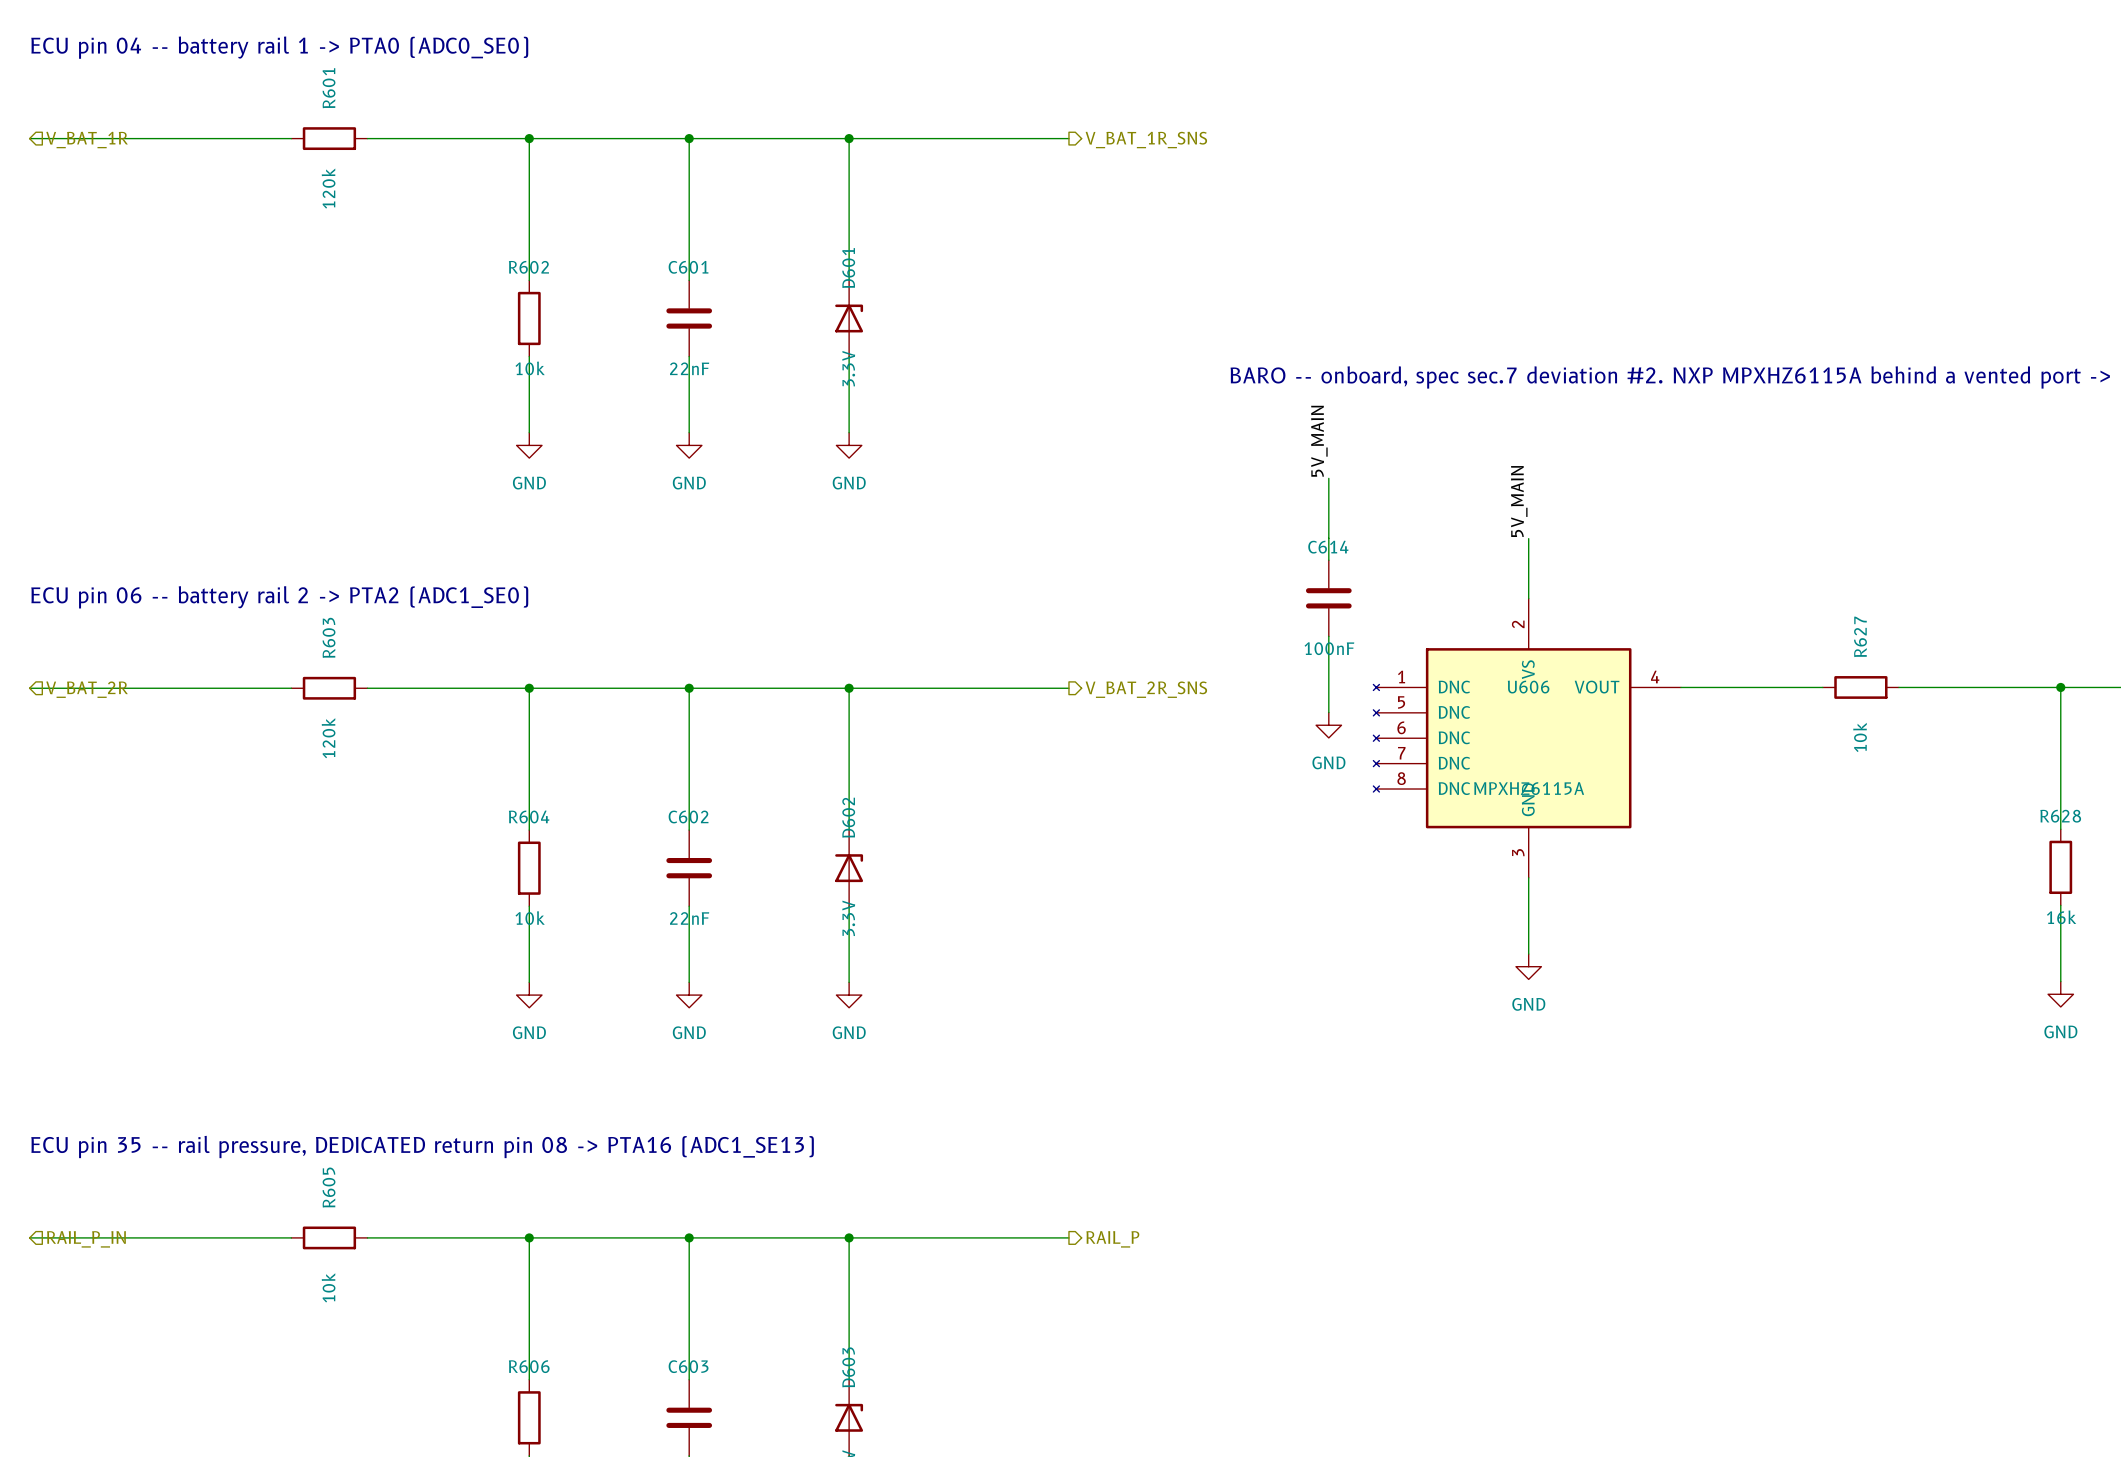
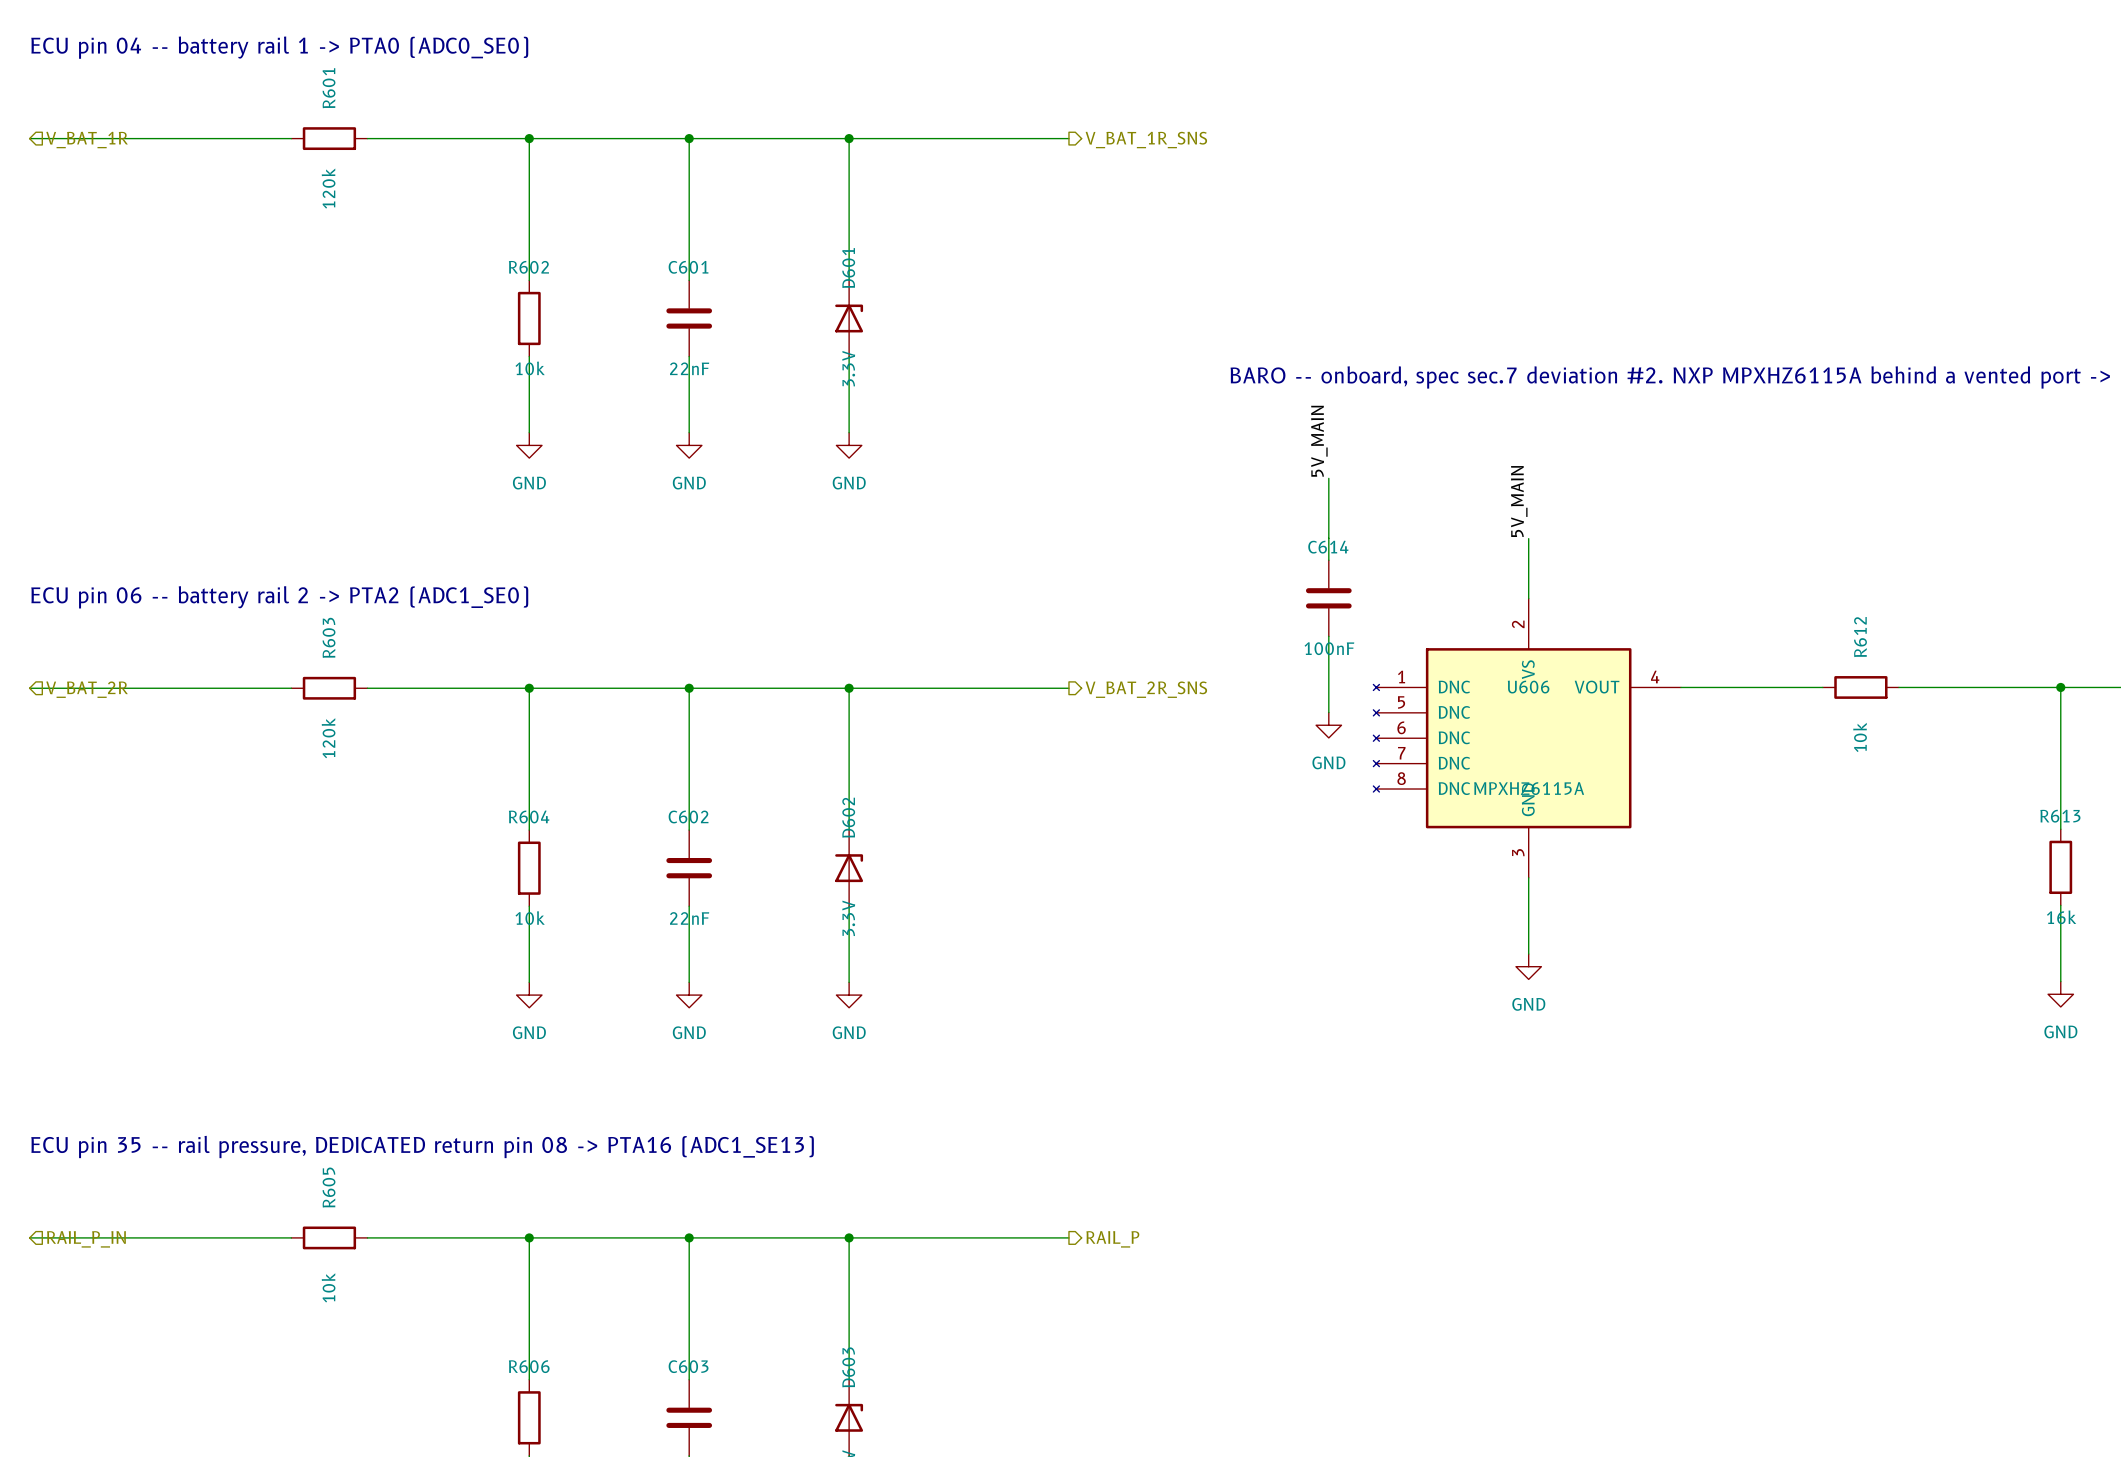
R627 name: R627 (1860, 636) -> R612 (1860, 637)
R628 name: R628 (2060, 816) -> R613 (2060, 816)

